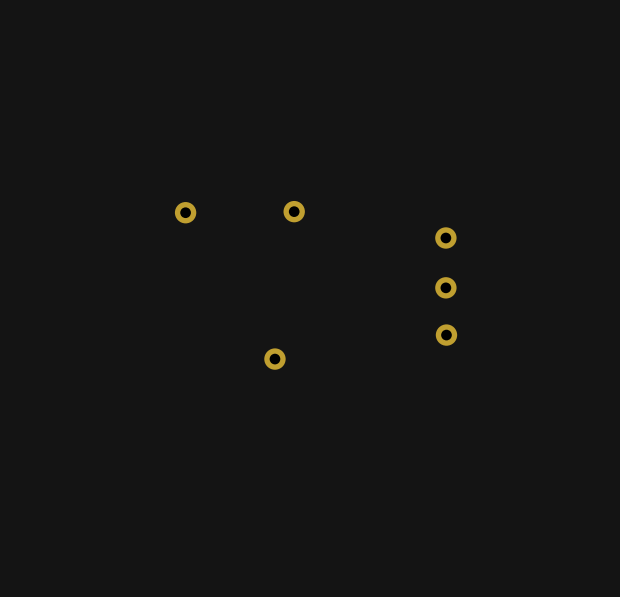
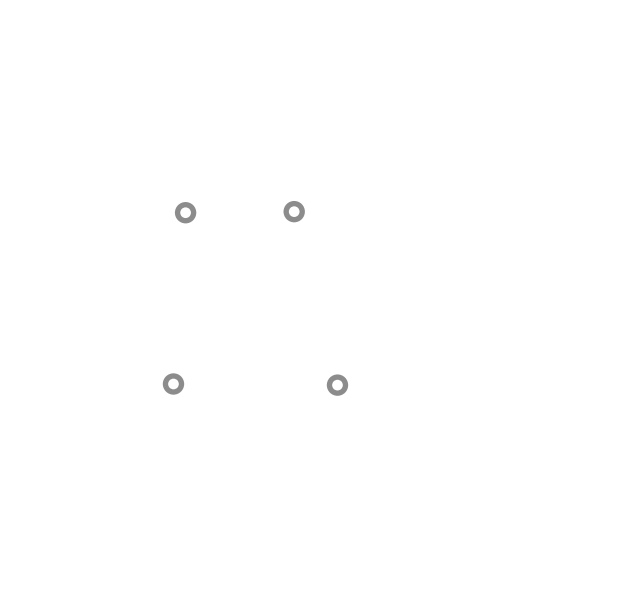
via: (445, 237) -> none
via: (445, 287) -> none
via: (446, 335) -> none
via: (274, 359) -> none
via: none -> (173, 383)
via: none -> (337, 385)

